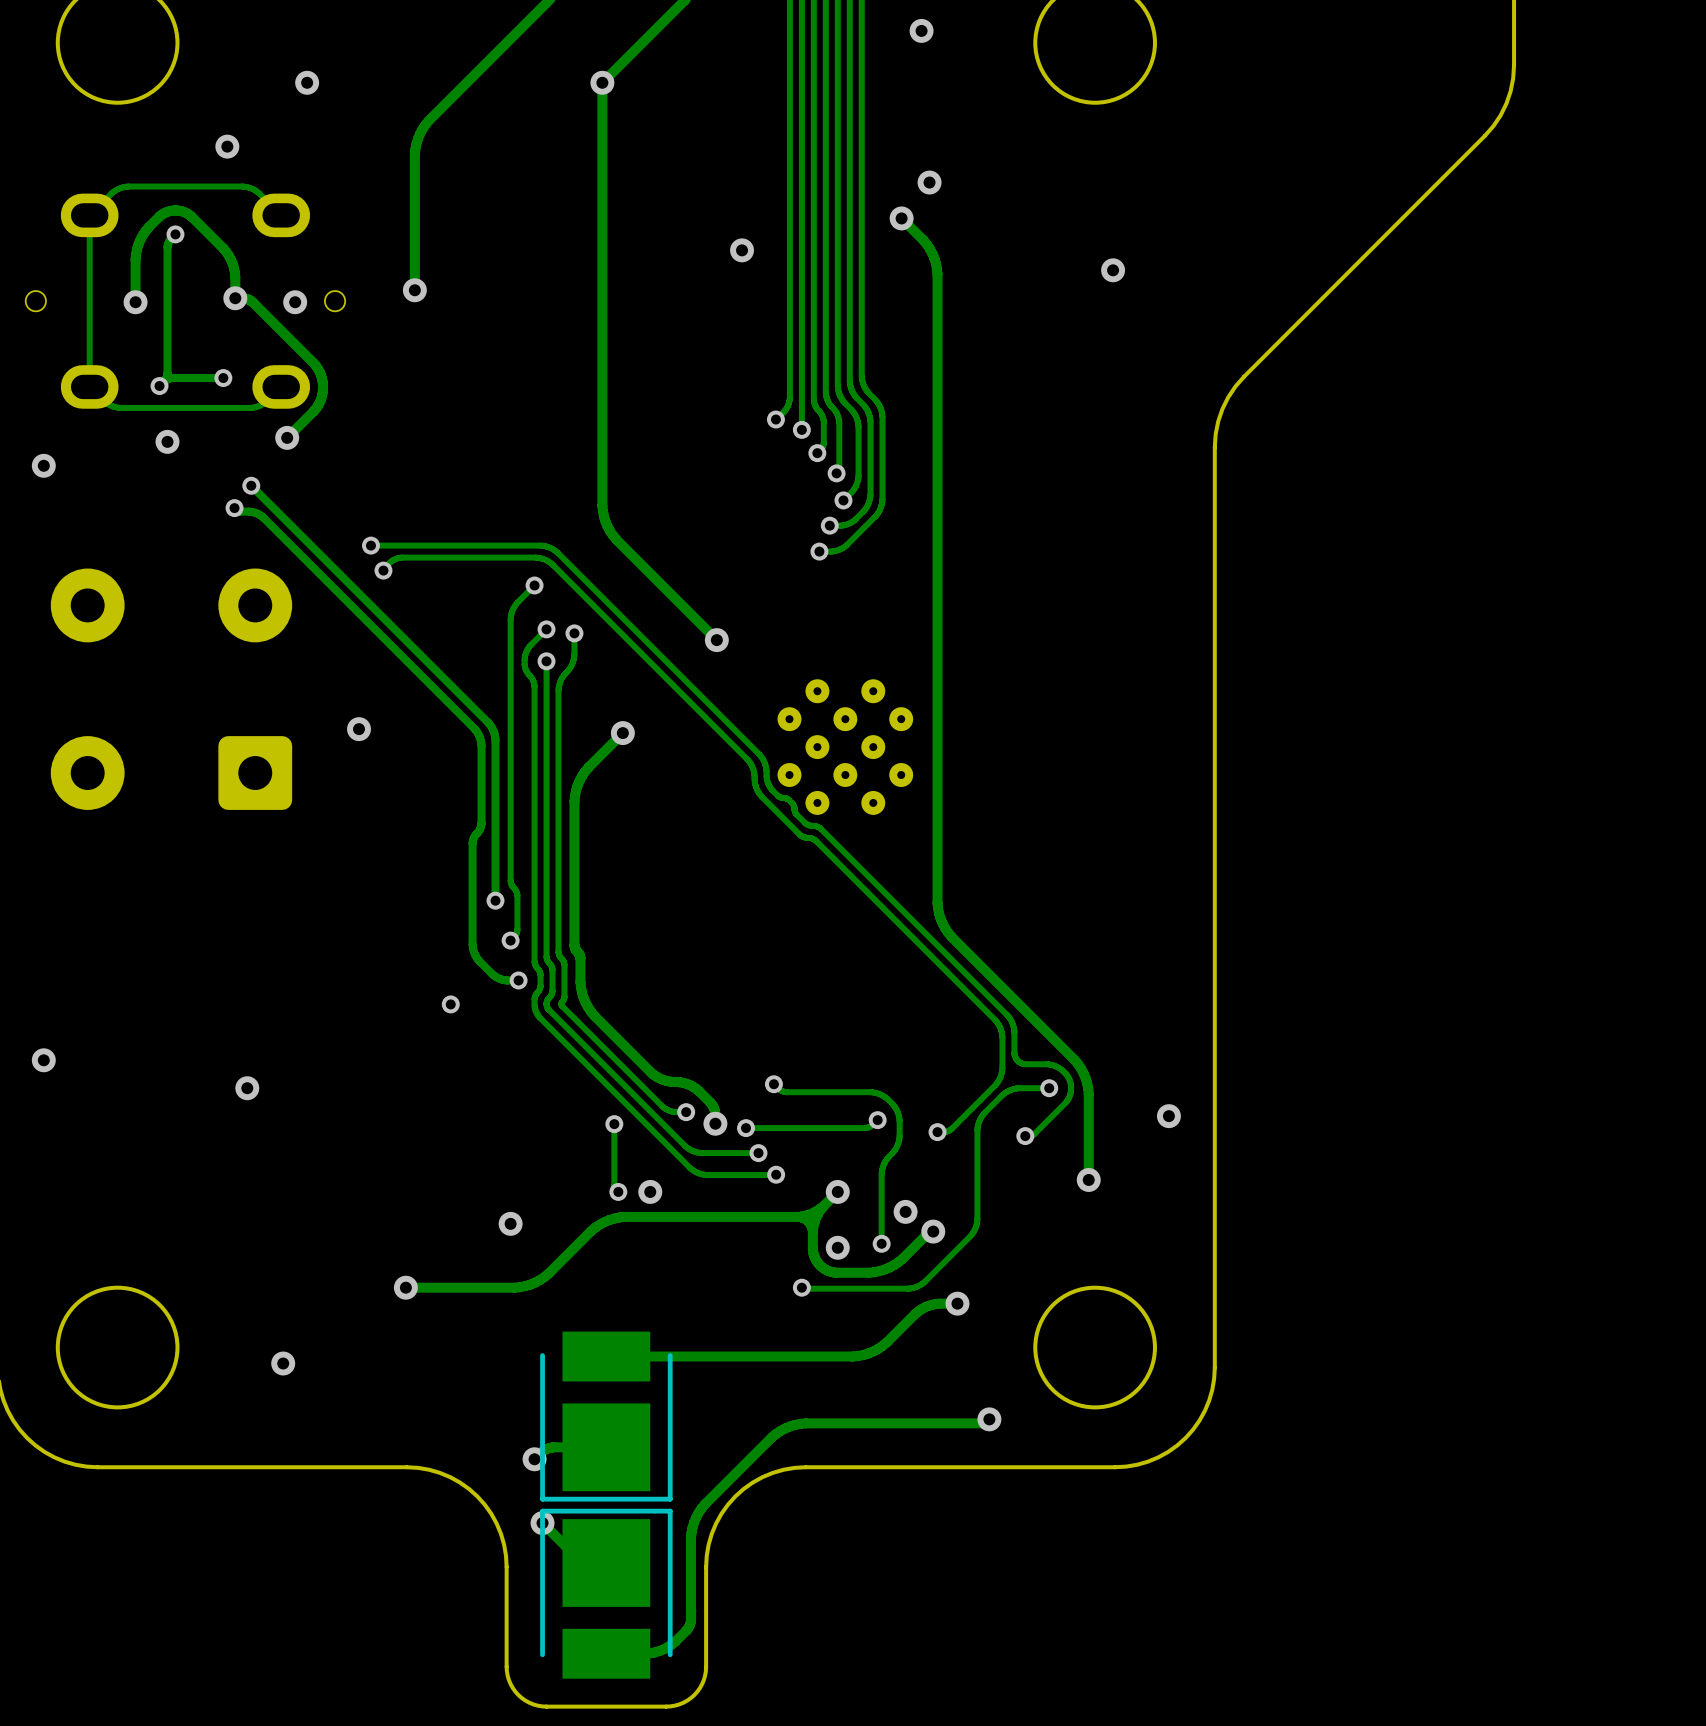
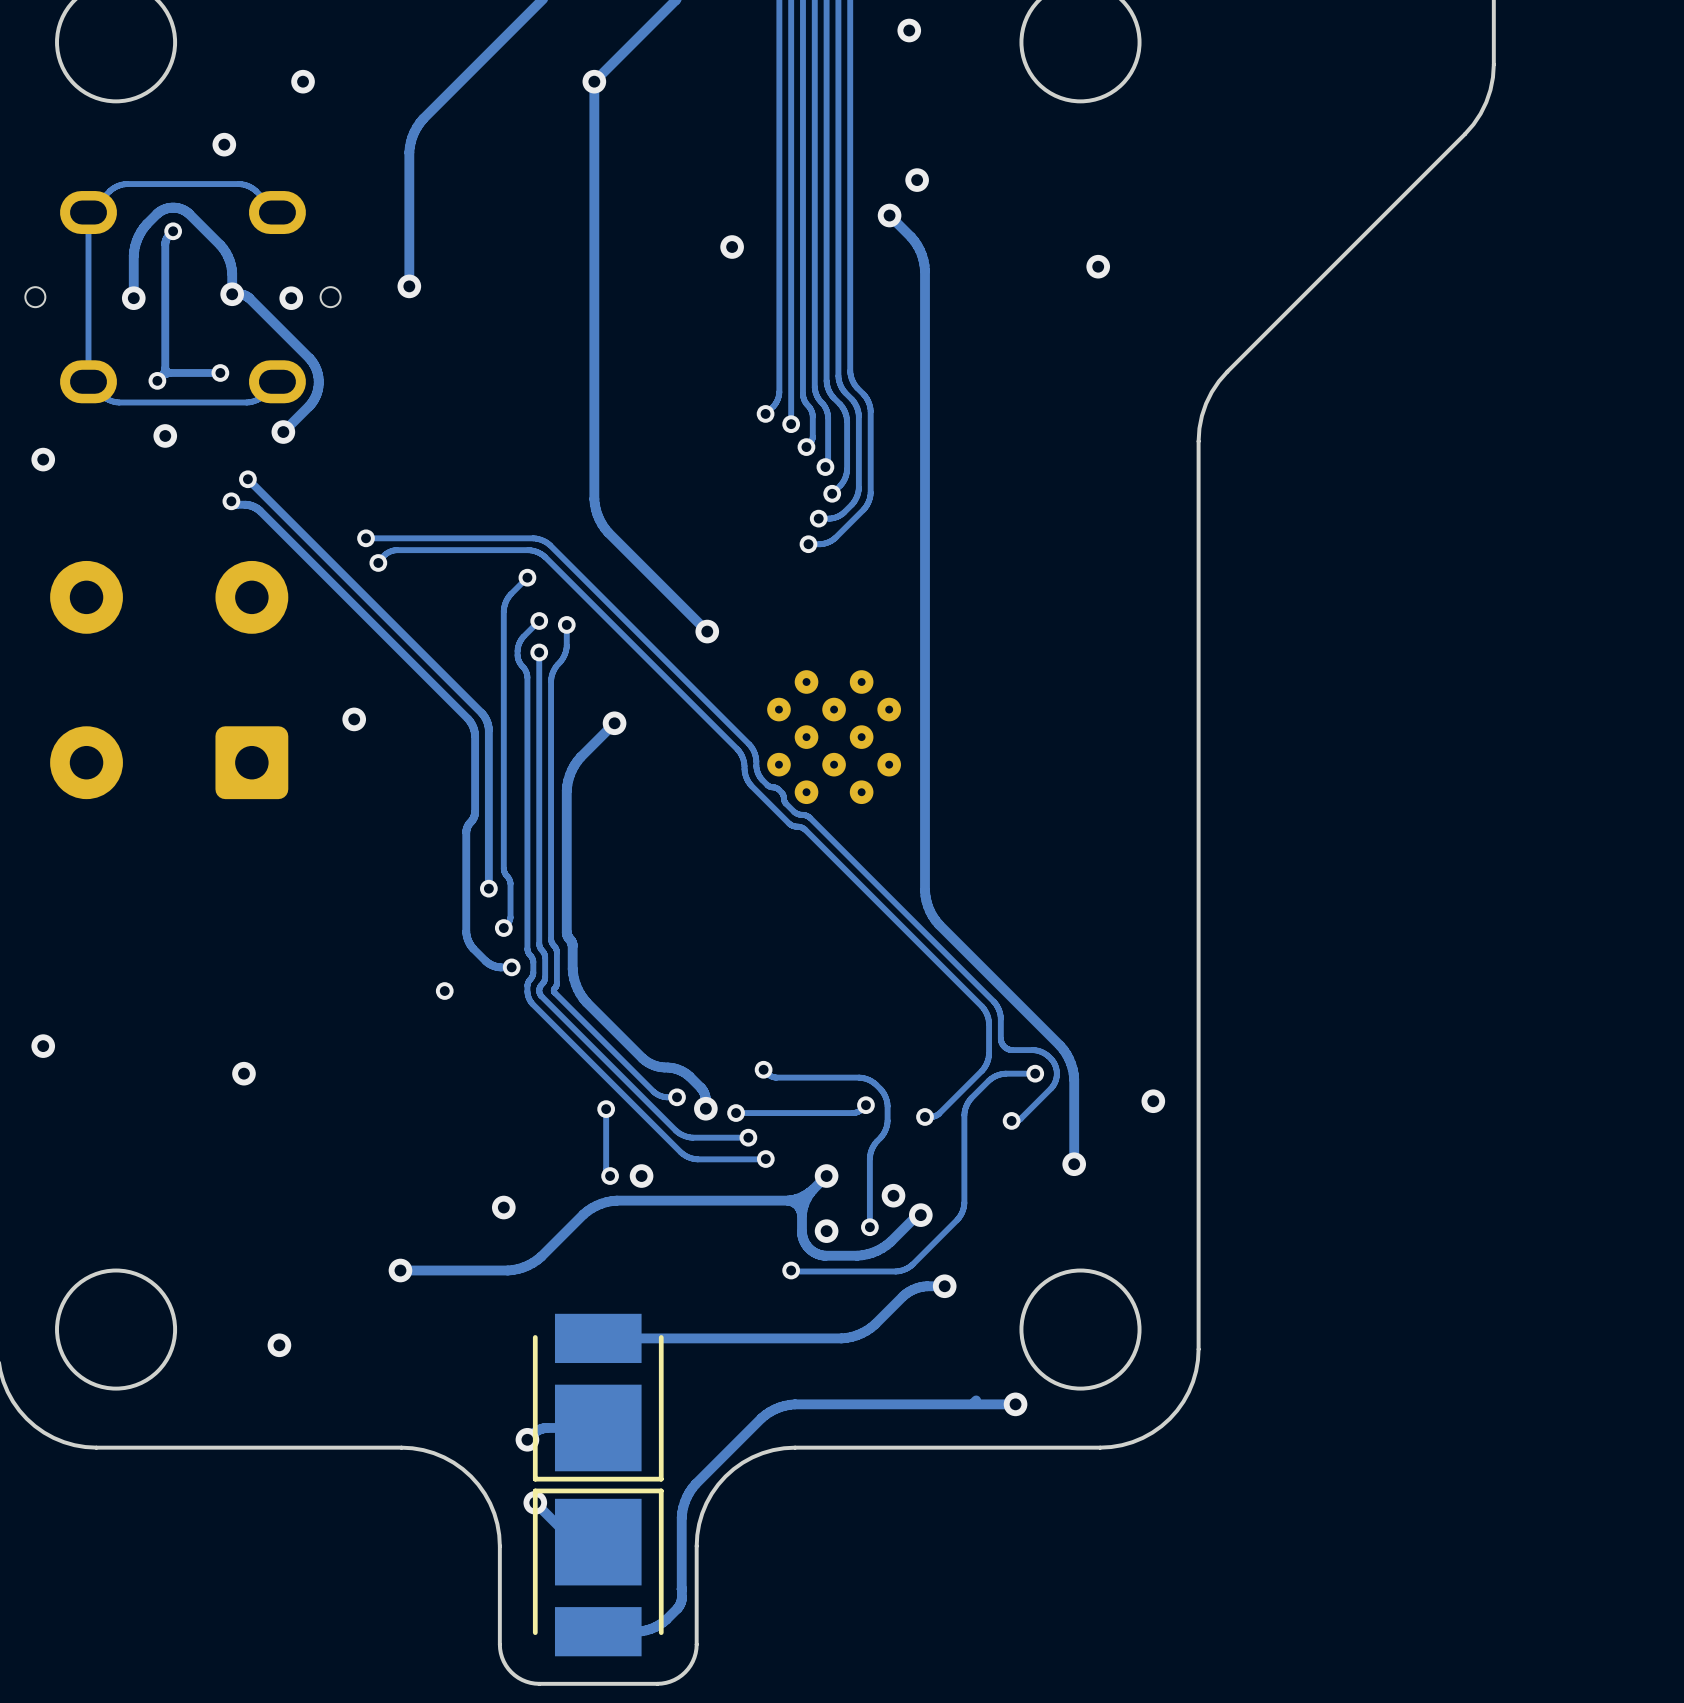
via position: (989, 1419) -> (1015, 1404)
track: none -> (1015, 1404) (969, 1404)

